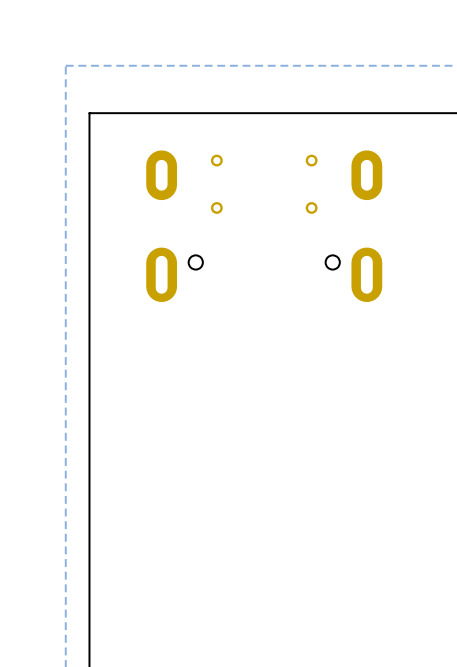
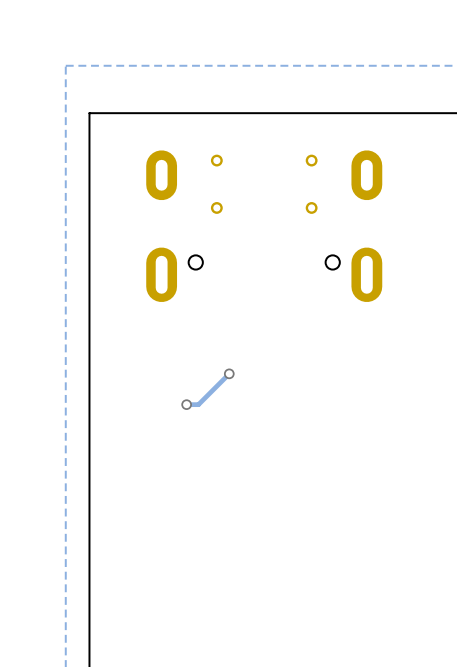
track: none -> (229, 373) (198, 404) (186, 404)
via: none -> (229, 373)
via: none -> (186, 404)

